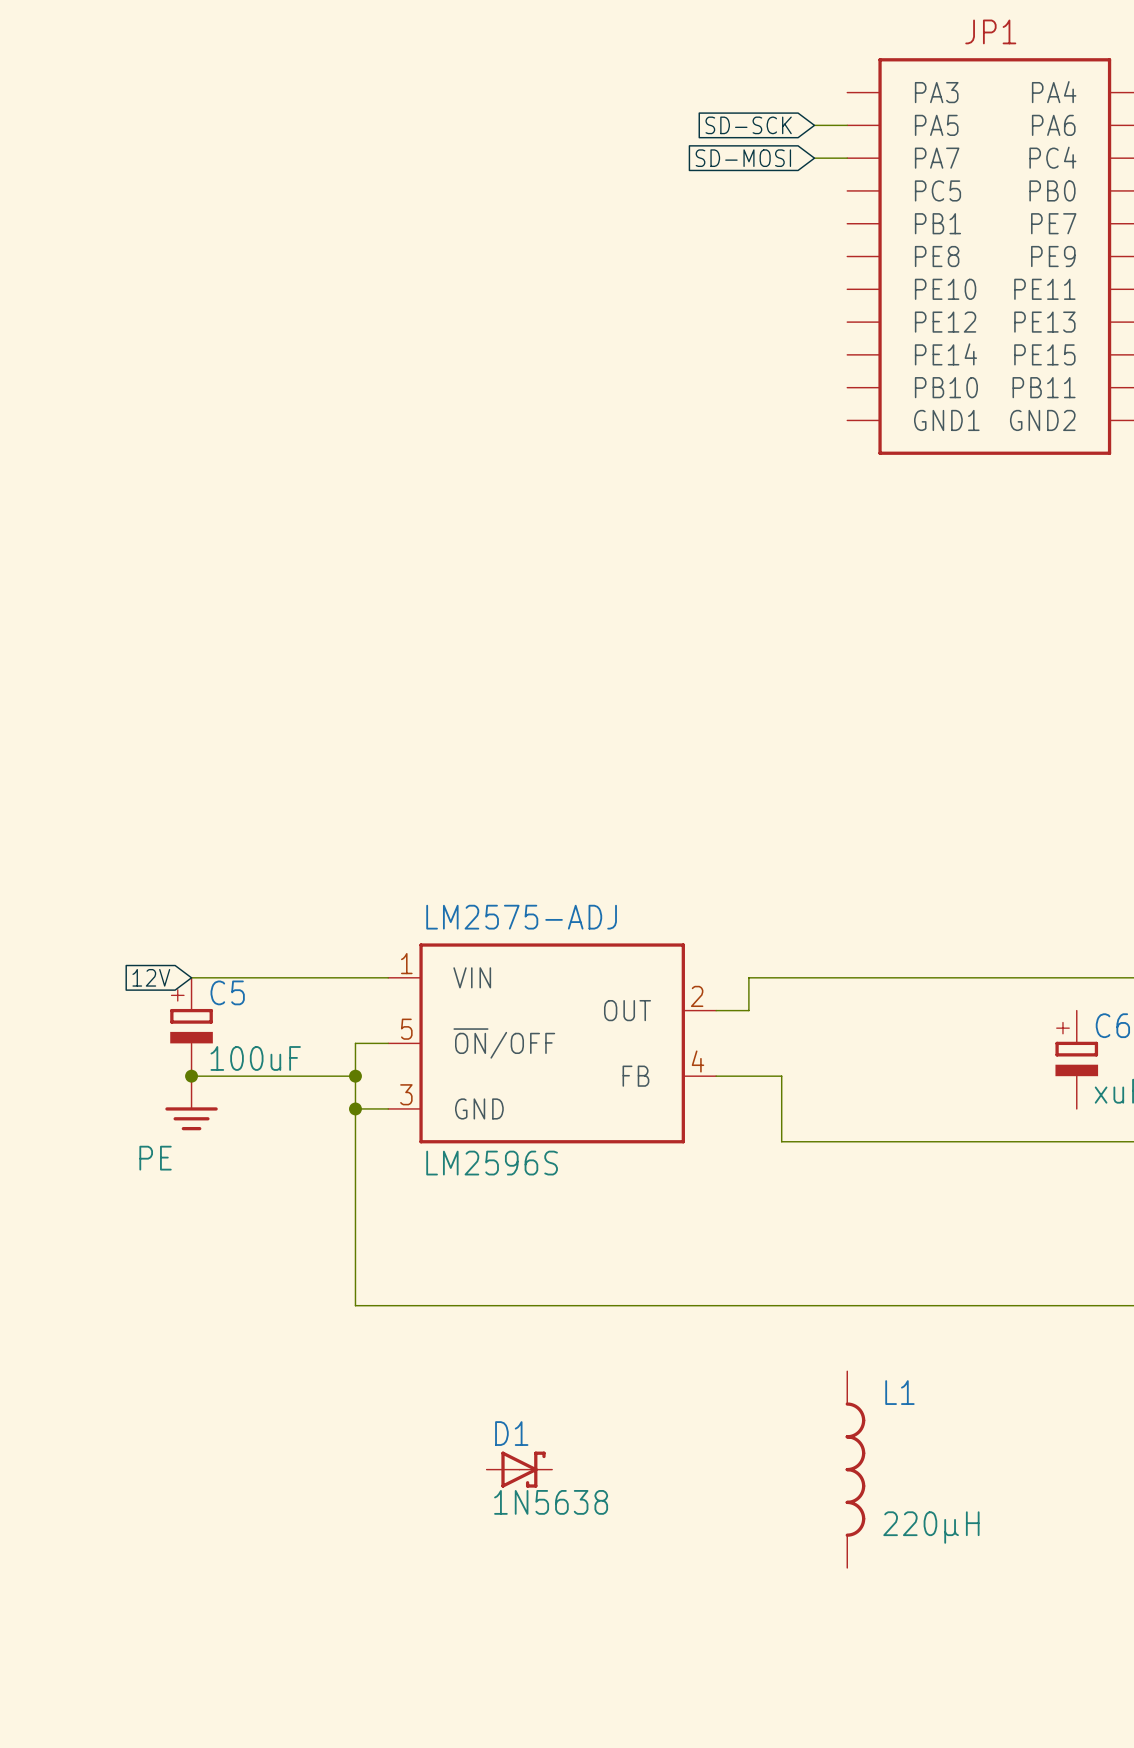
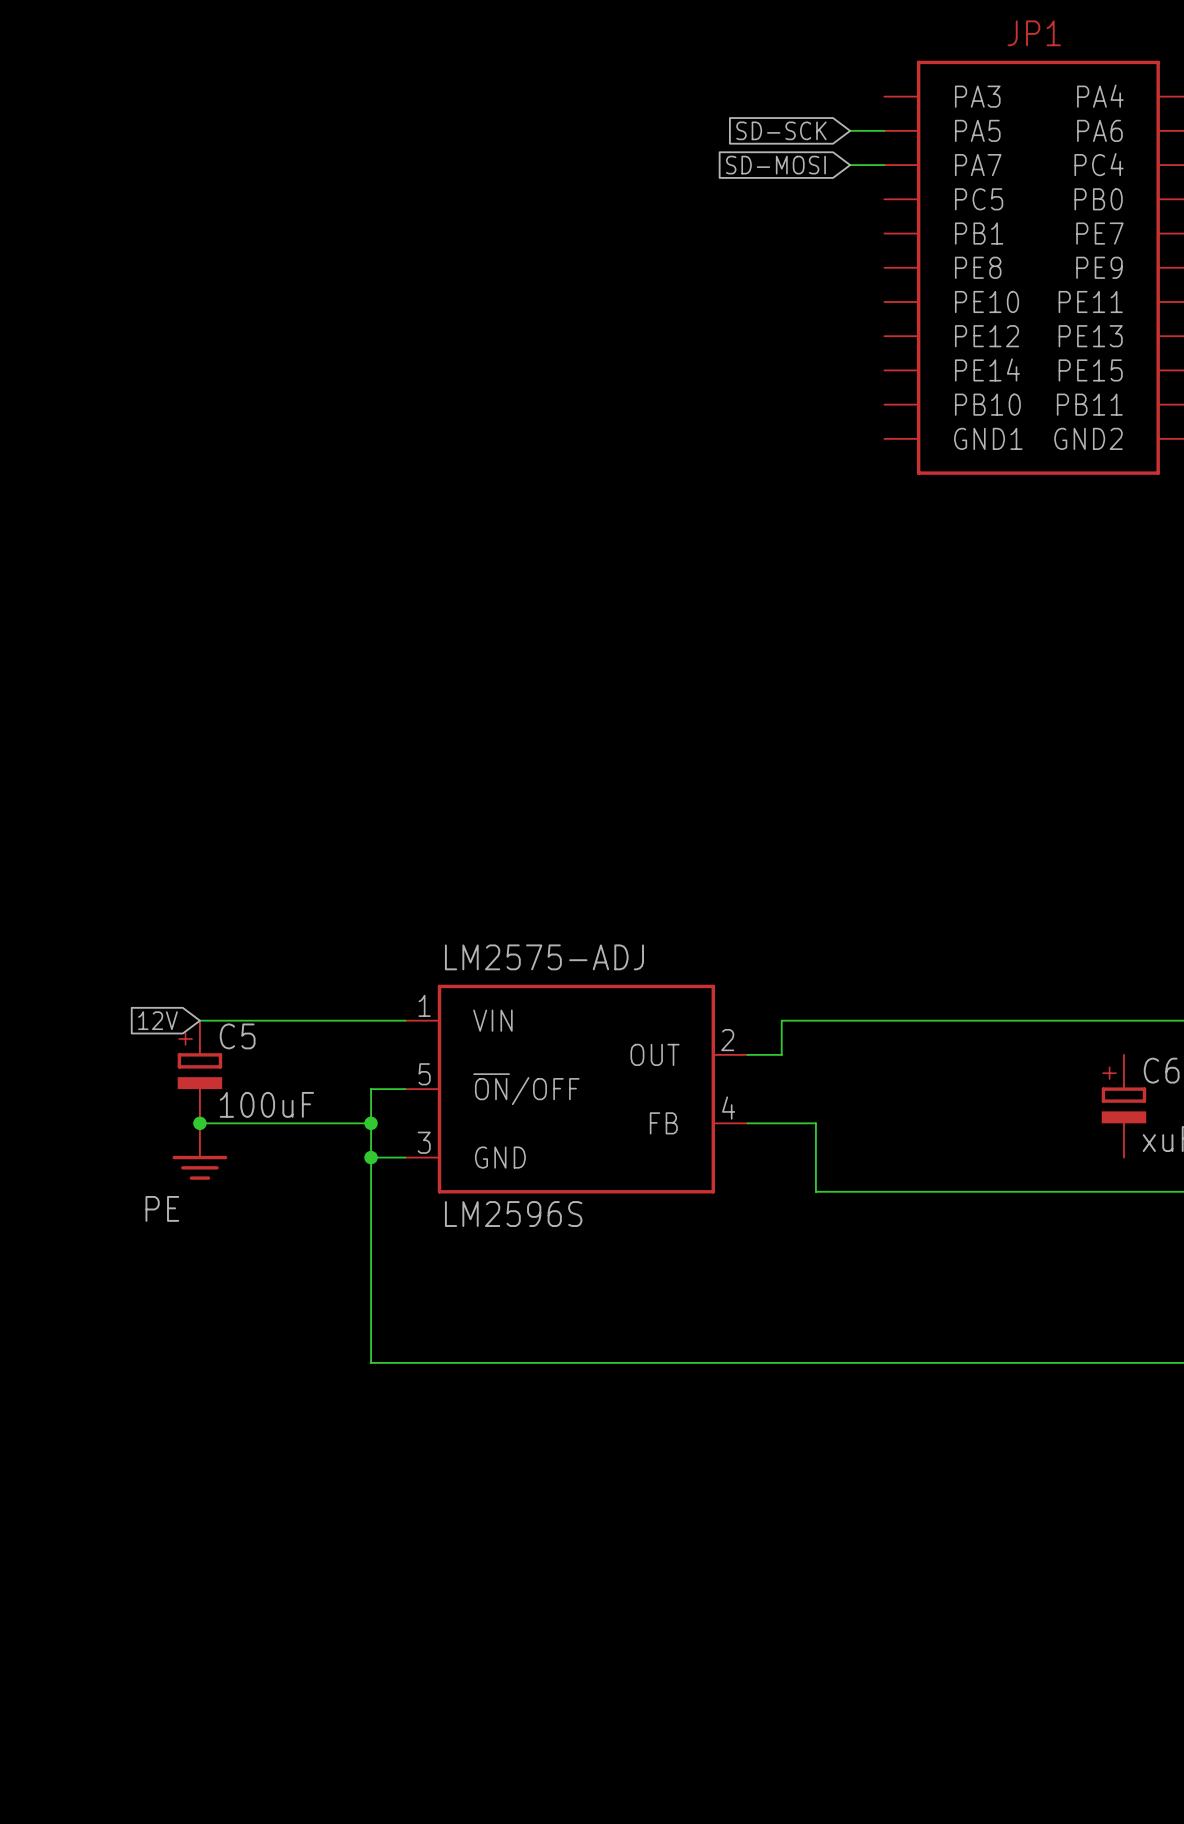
D1: 1N5638 (519, 1469) -> none
L1: 220µH (855, 1469) -> none

